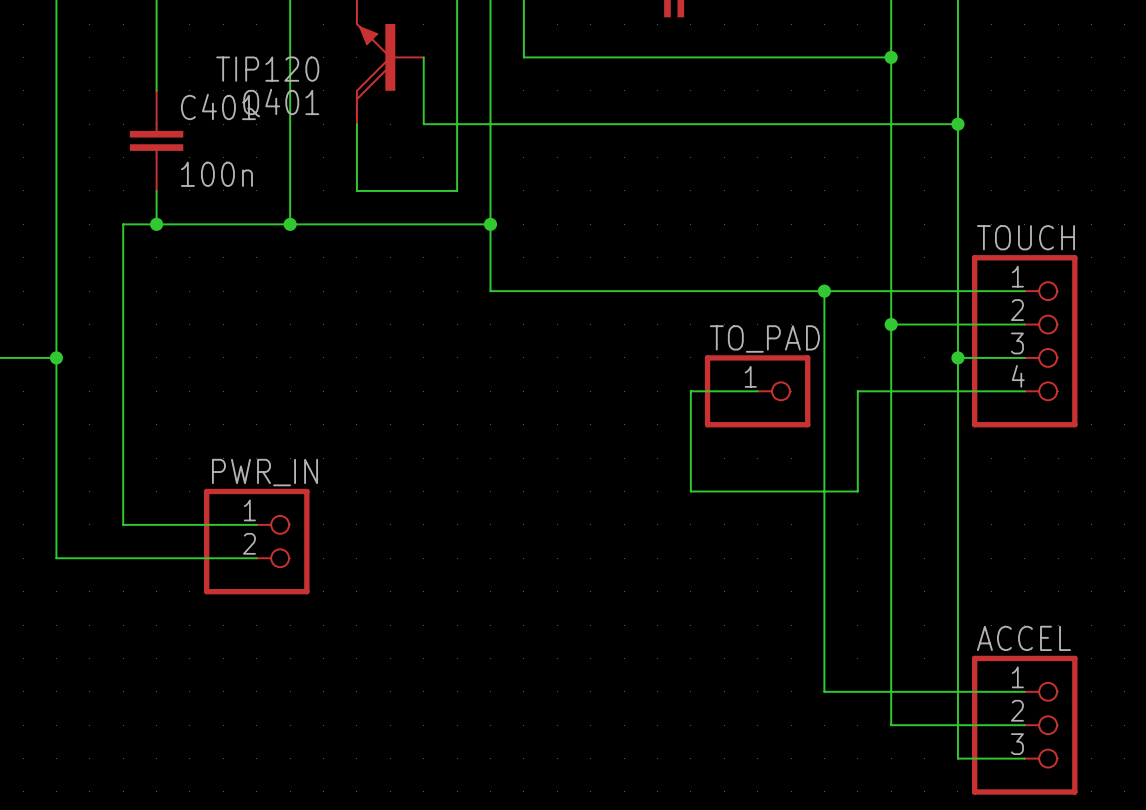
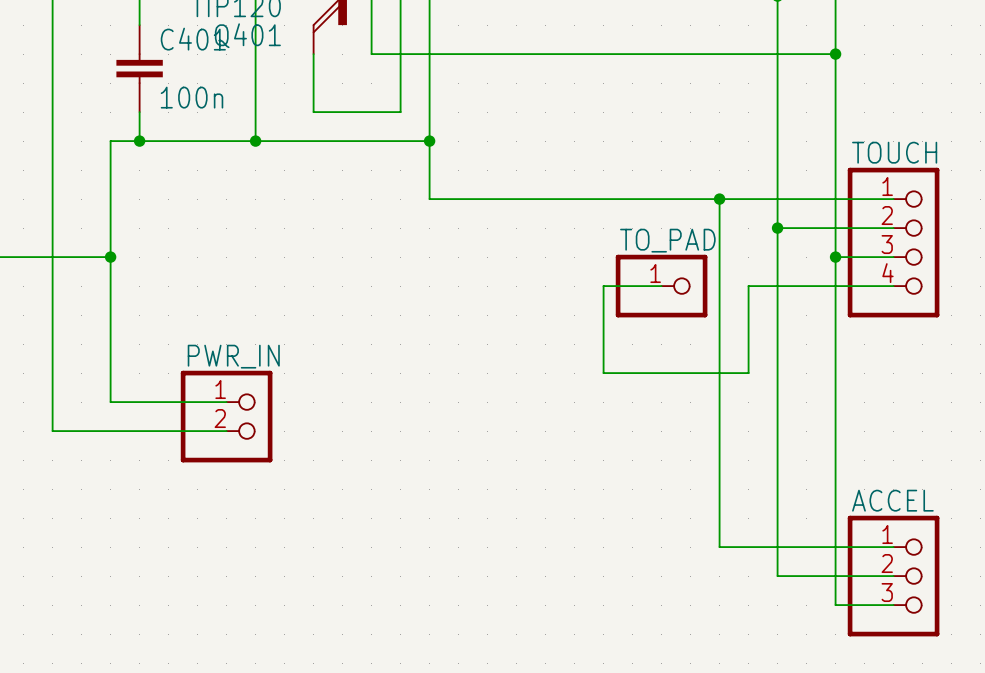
wire: none -> (52, 257) (110, 257)
junction position: (56, 357) -> (110, 257)

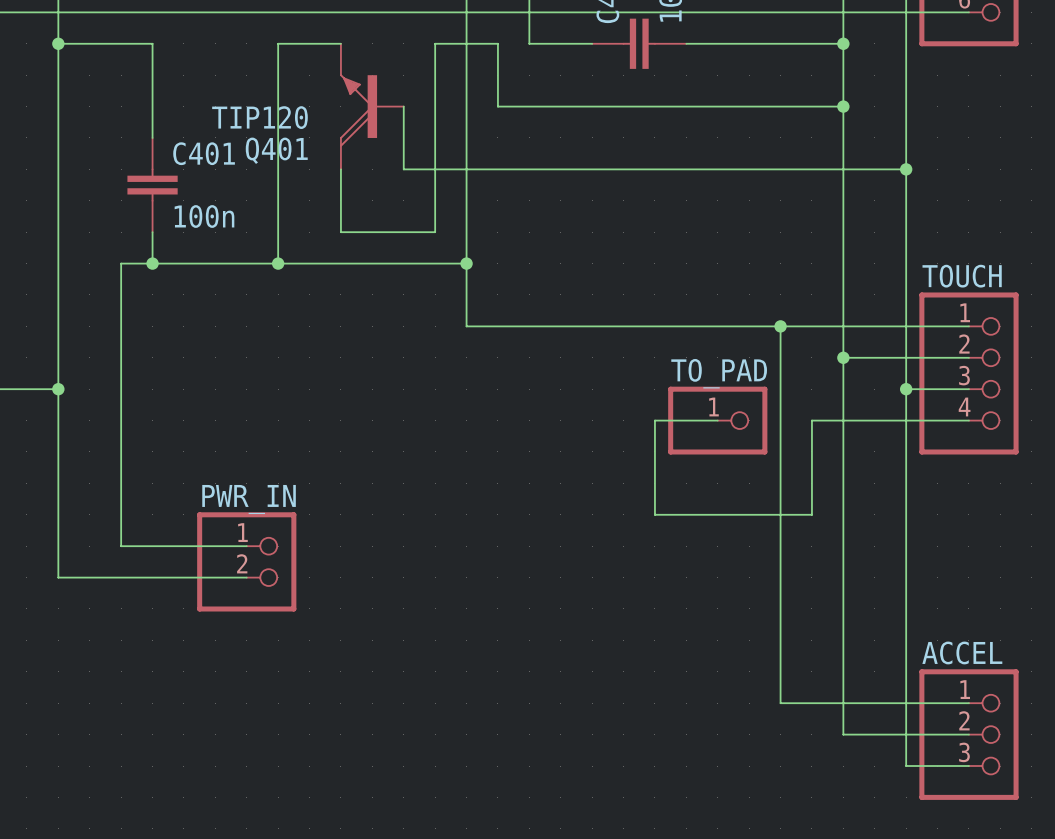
wire: (52, 257) (110, 257) -> none
junction position: (110, 257) -> (58, 389)

